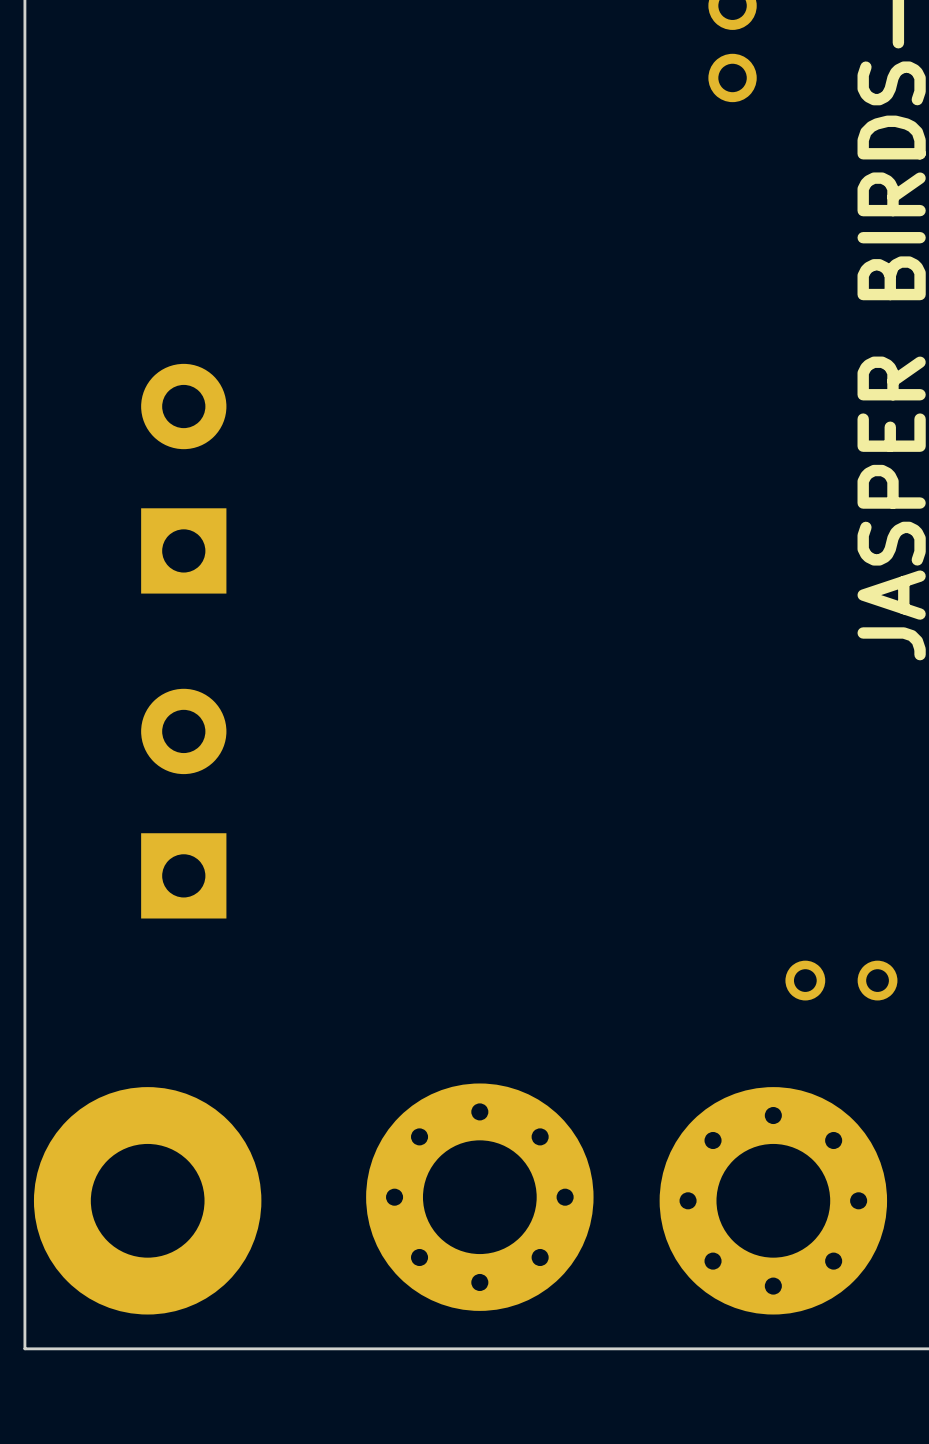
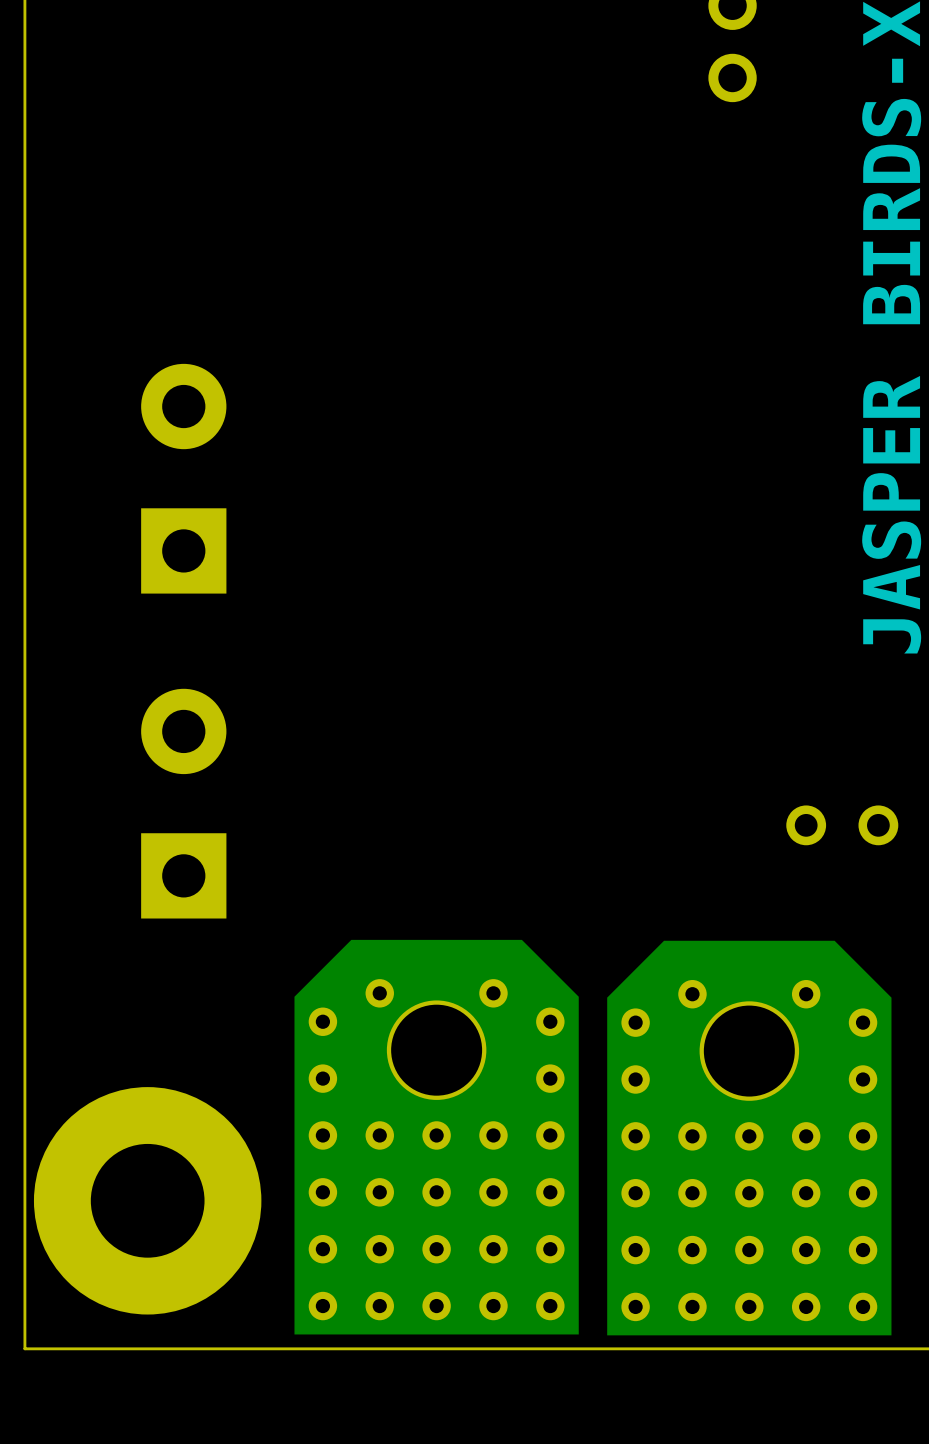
part position: (841, 980) -> (842, 825)
part: none -> (436, 1137)
part: none -> (749, 1138)
part: (479, 1197) -> none
part: (773, 1200) -> none

